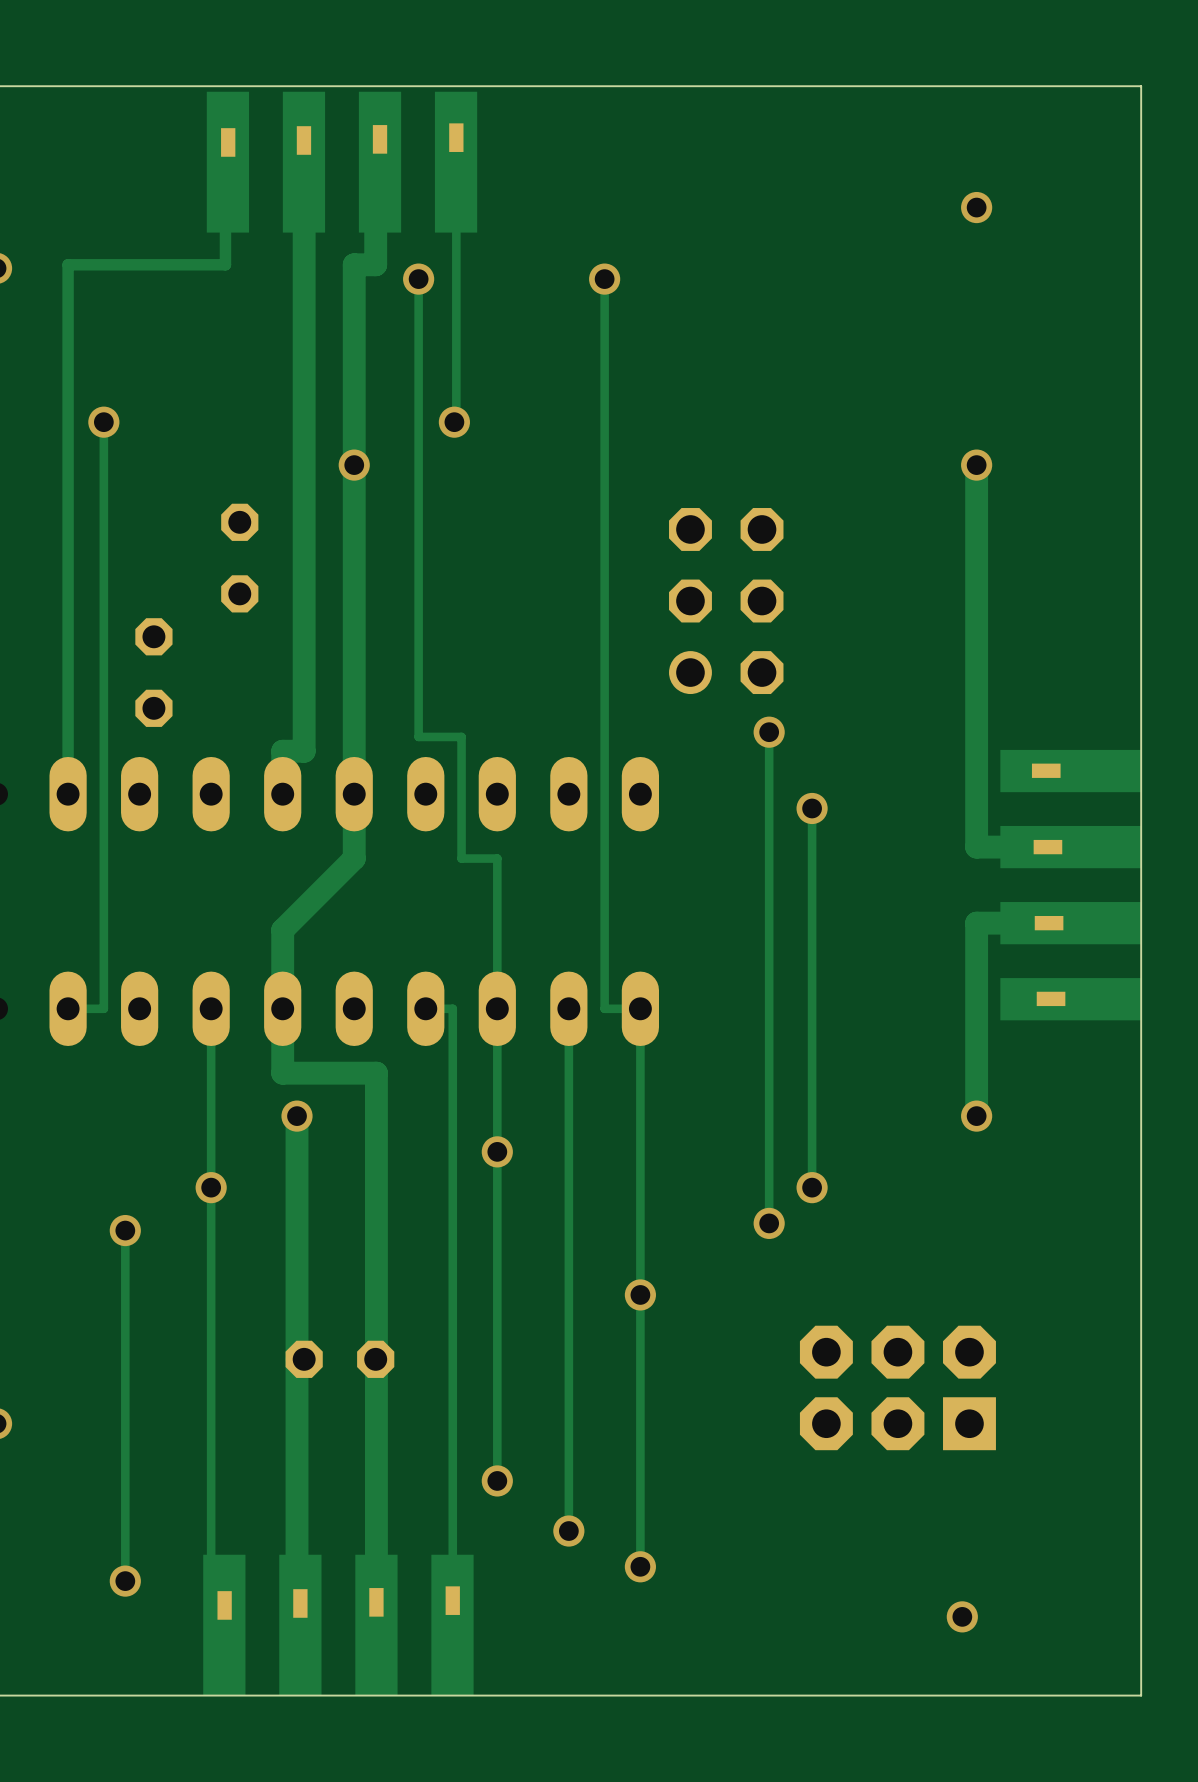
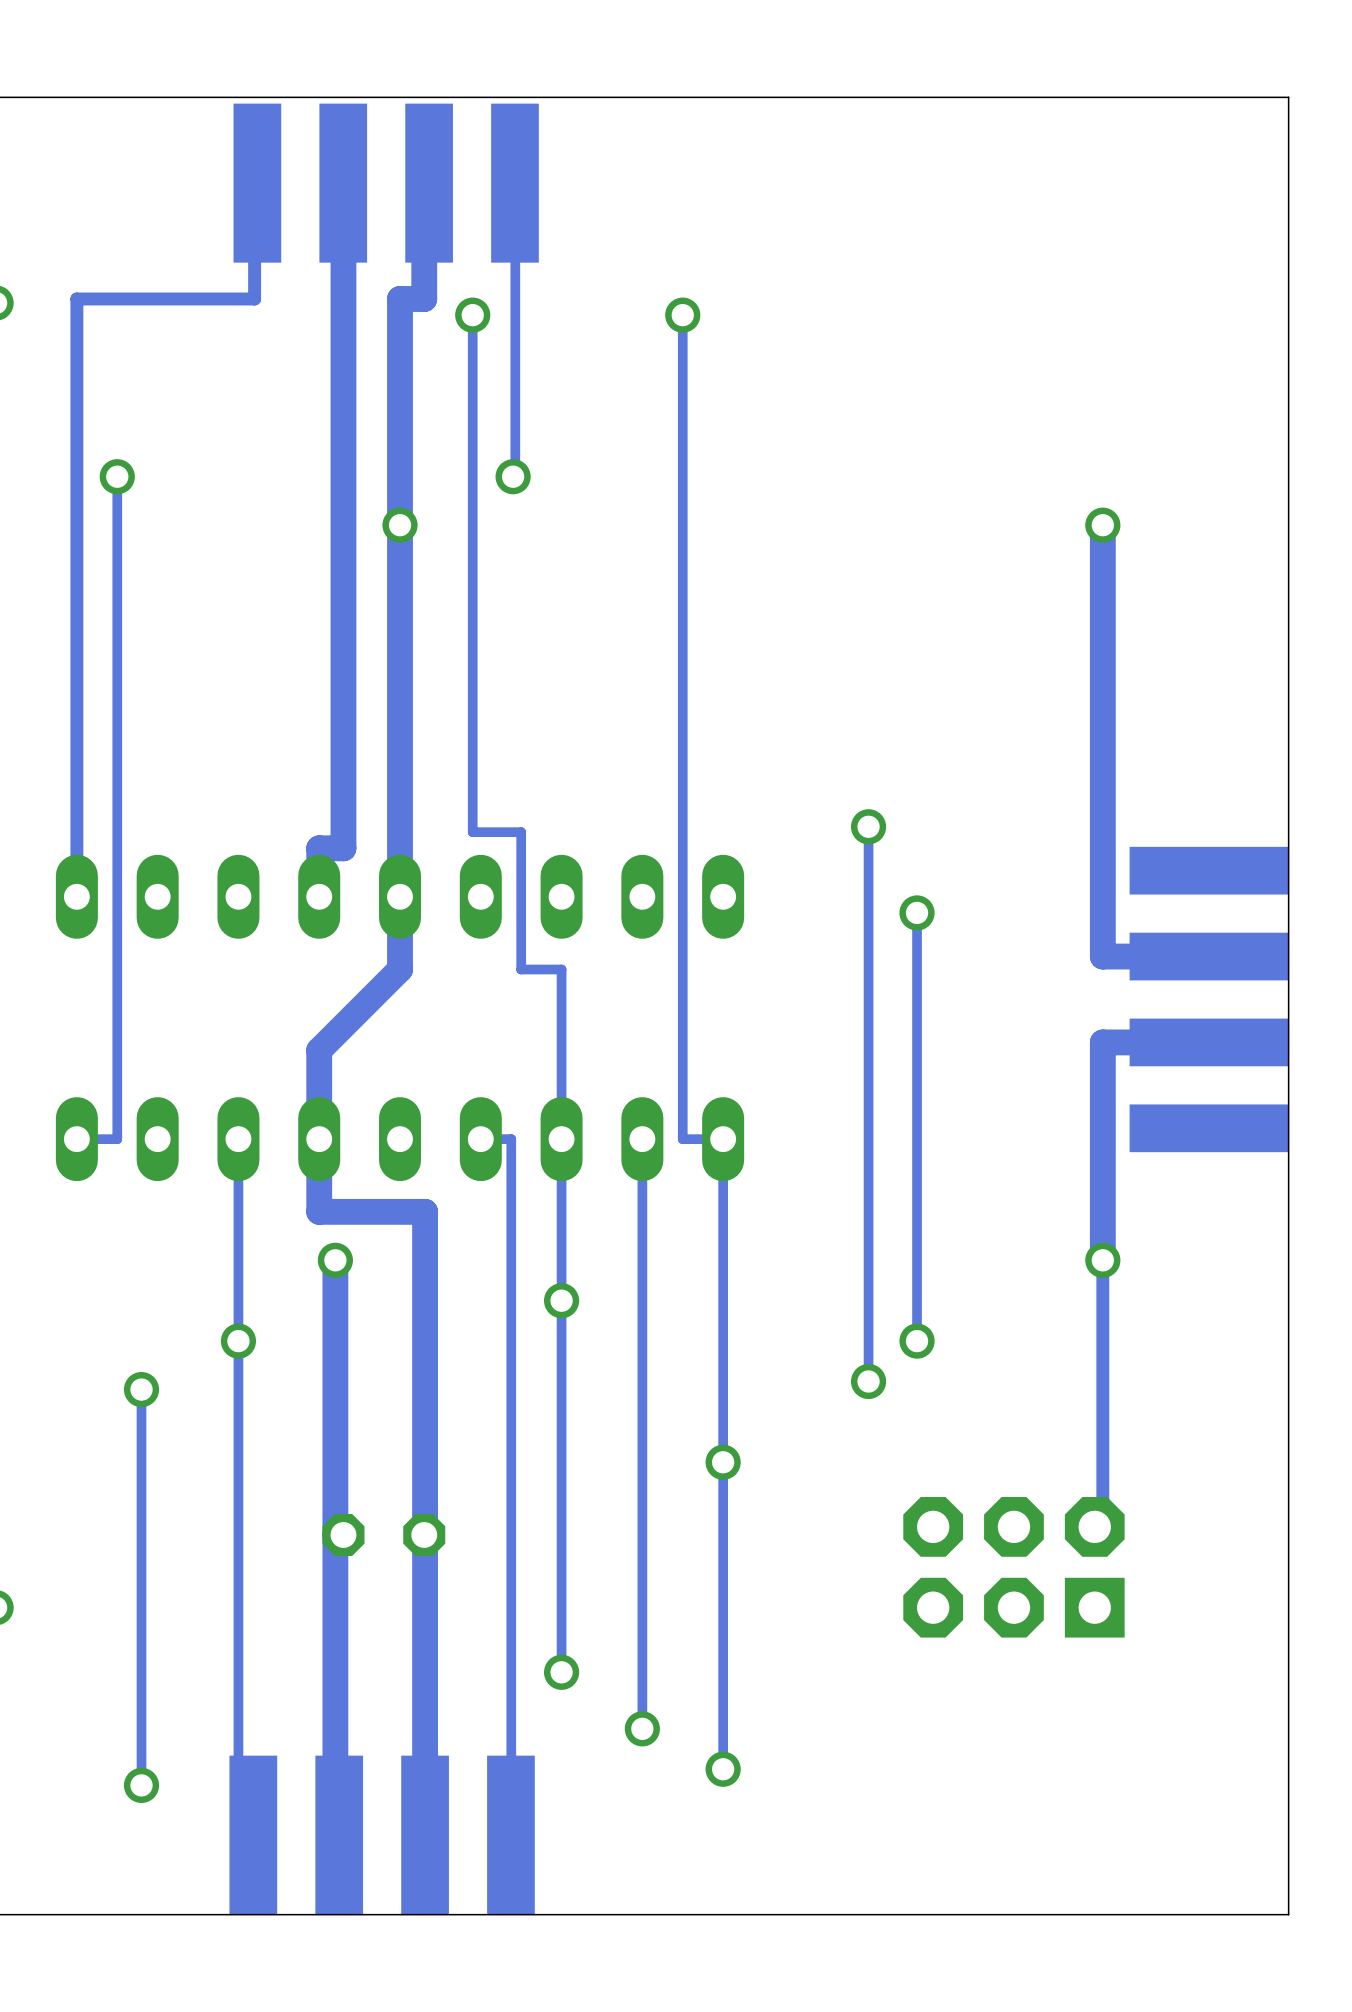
via: (976, 207) -> none
part: (239, 558) -> none
part: (726, 601) -> none
part: (153, 672) -> none
track: none -> (1102, 1260) (1102, 1526)
via: (962, 1616) -> none

